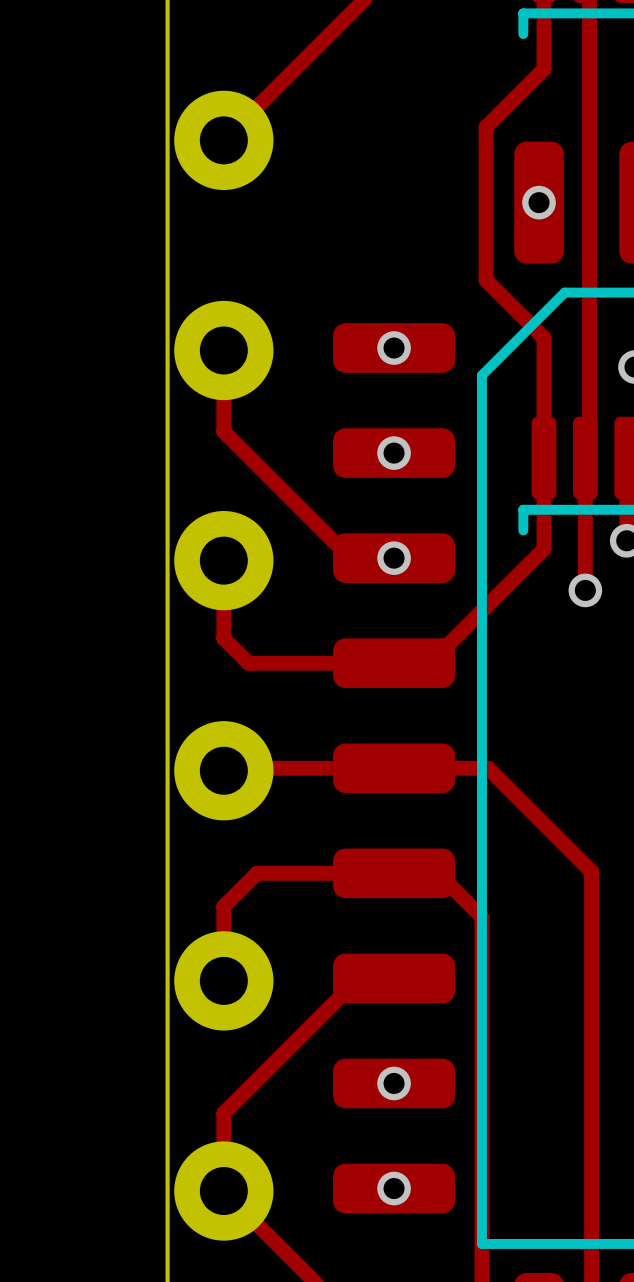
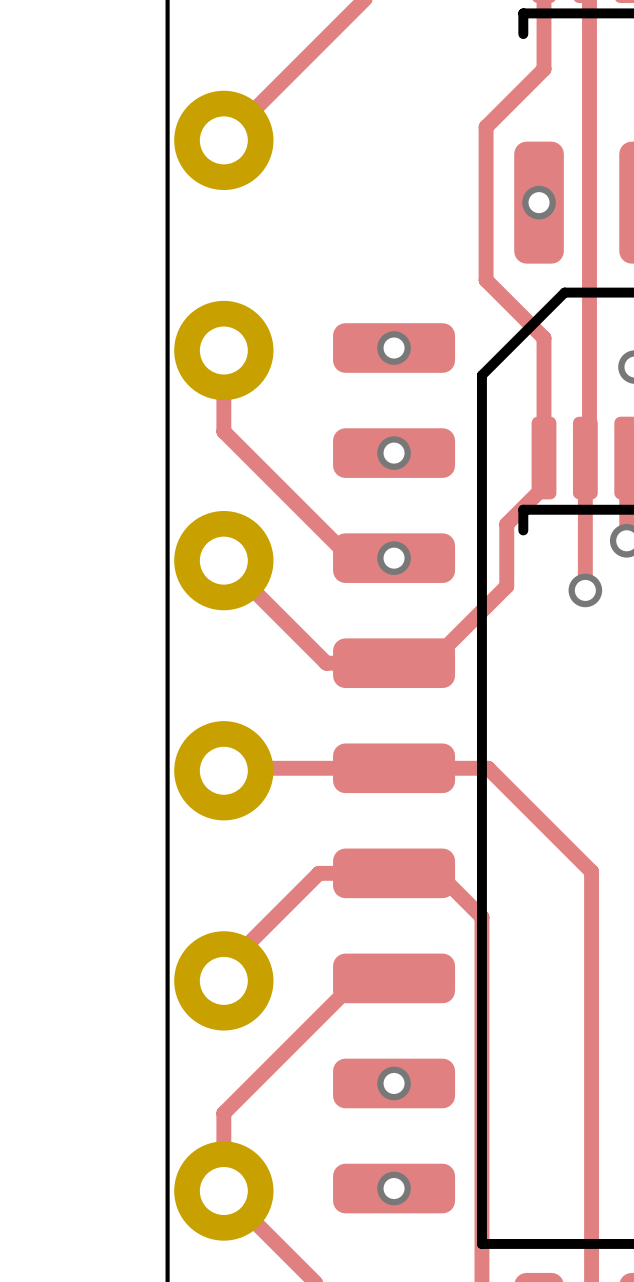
track: (544, 487) (544, 549) (506, 586) -> (544, 487) (506, 524) (506, 586)
track: (223, 560) (223, 638) (248, 663) (326, 663) -> (223, 560) (326, 663)
track: (318, 873) (256, 873) (223, 906) (223, 968) -> (318, 873) (223, 968)

